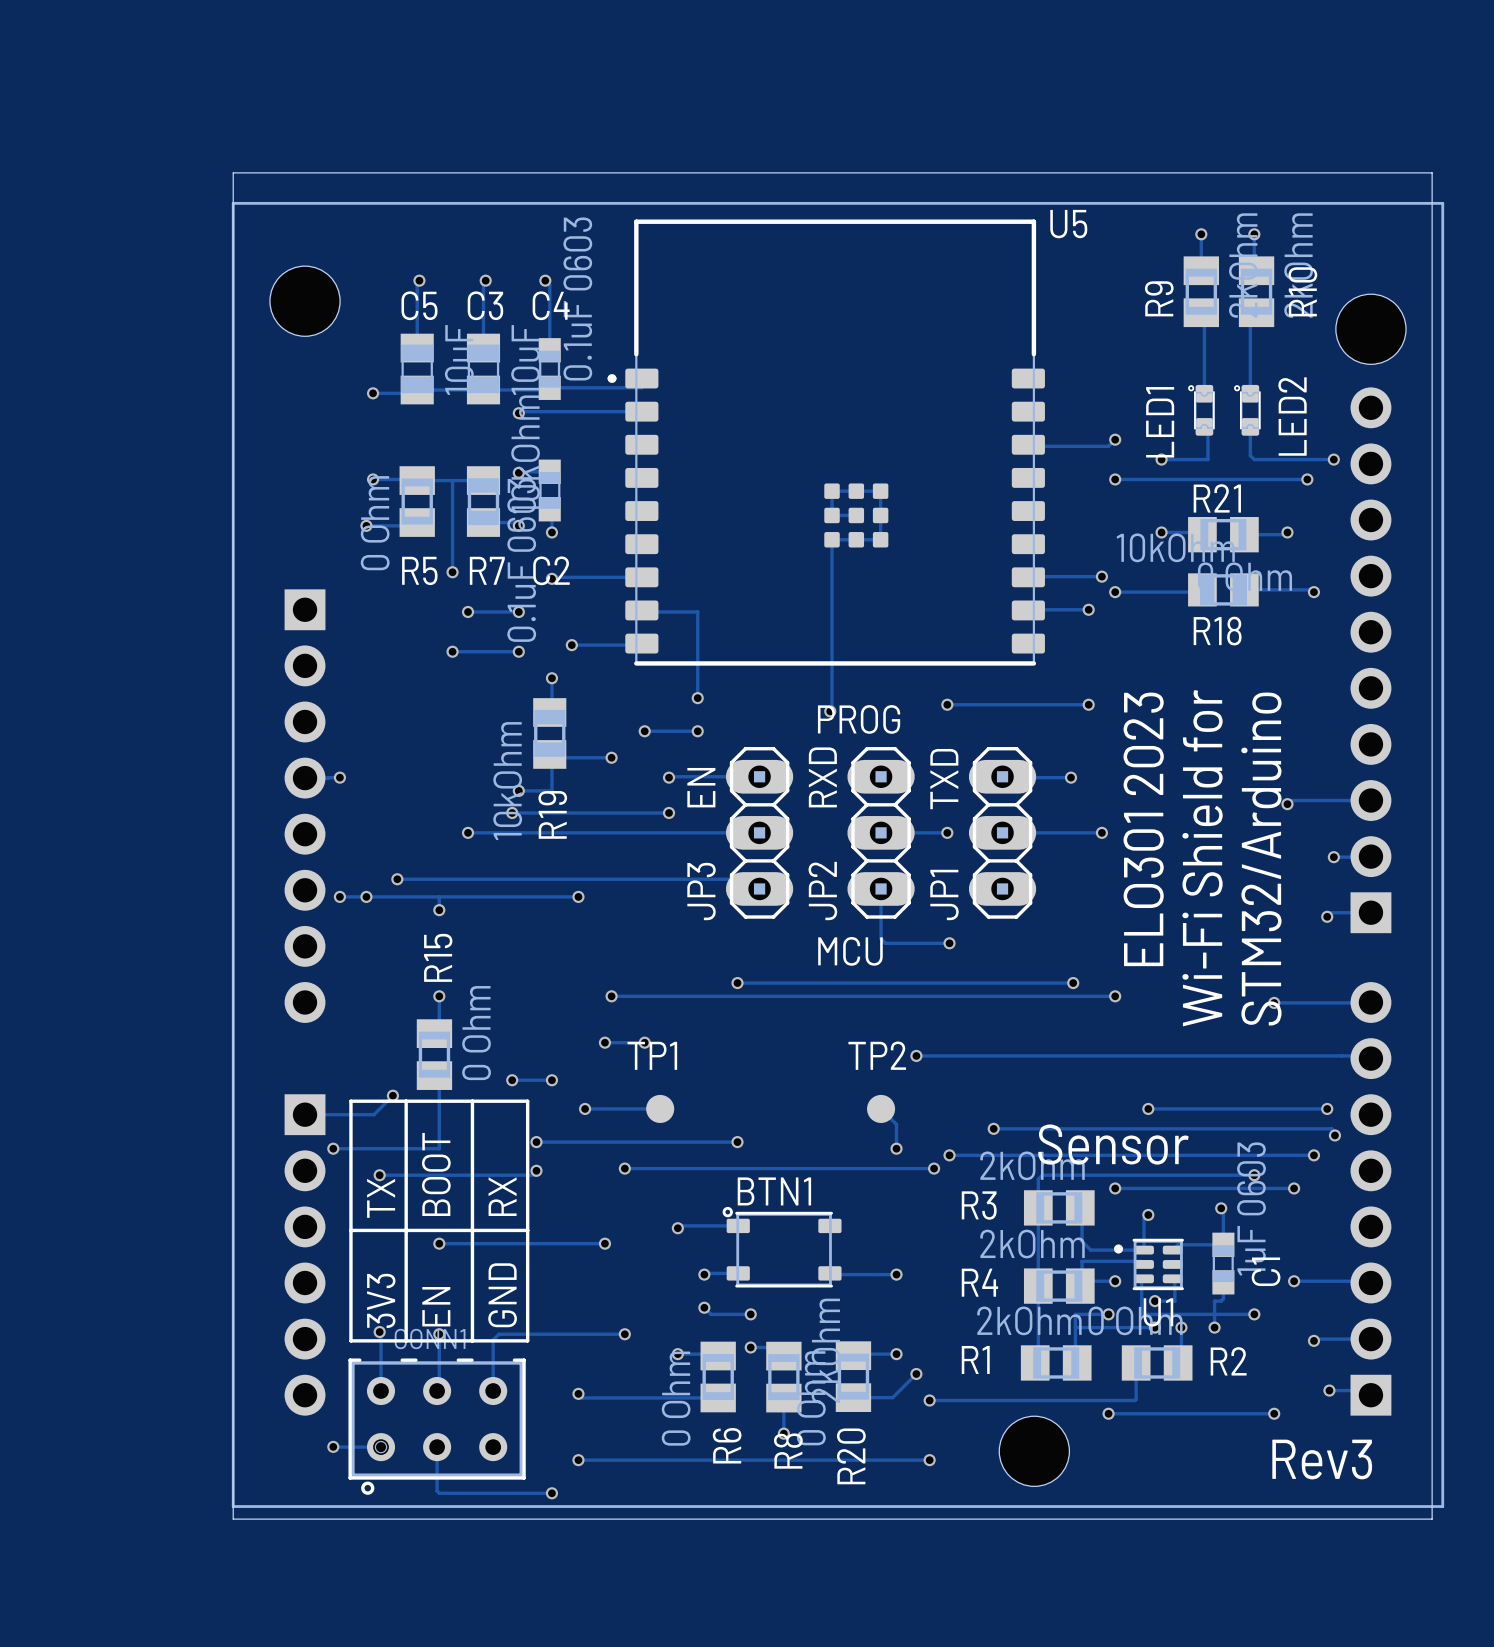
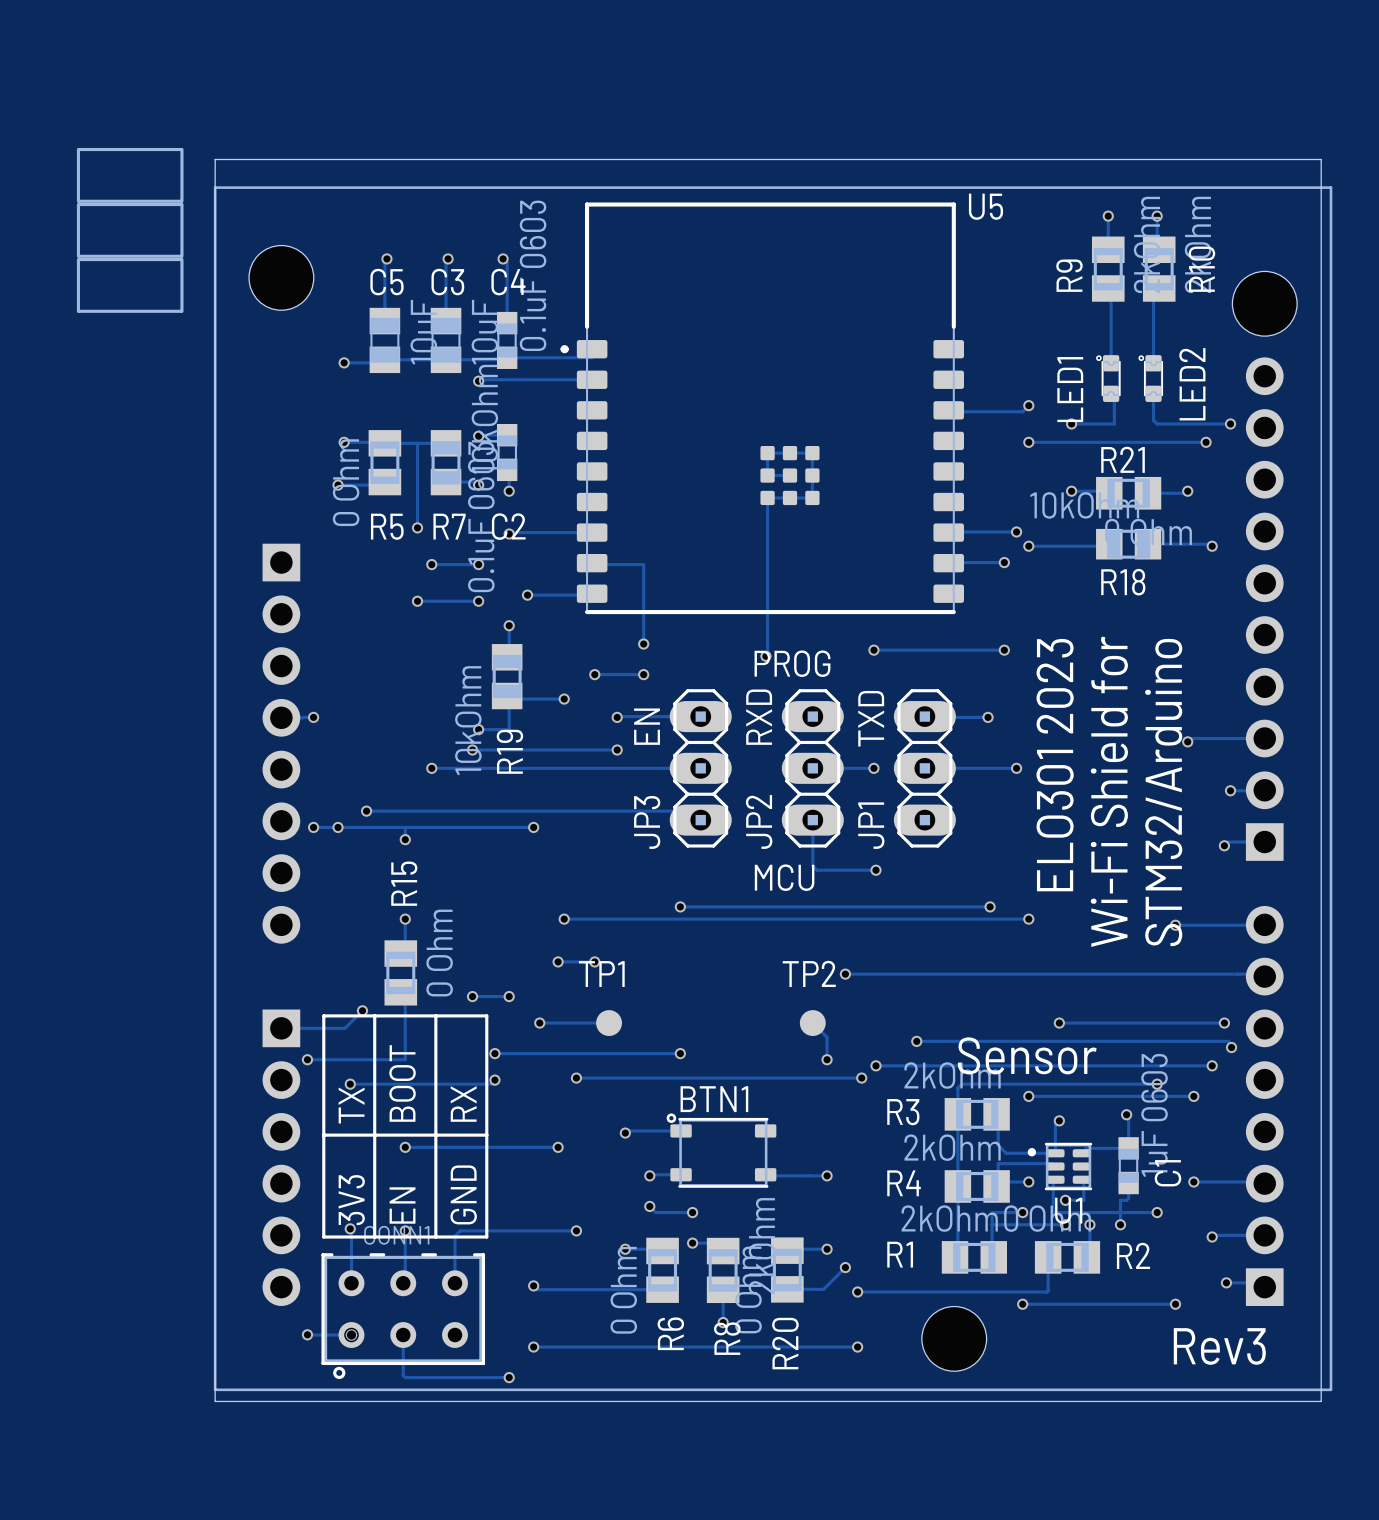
drawing: none -> [76, 147, 184, 313]

